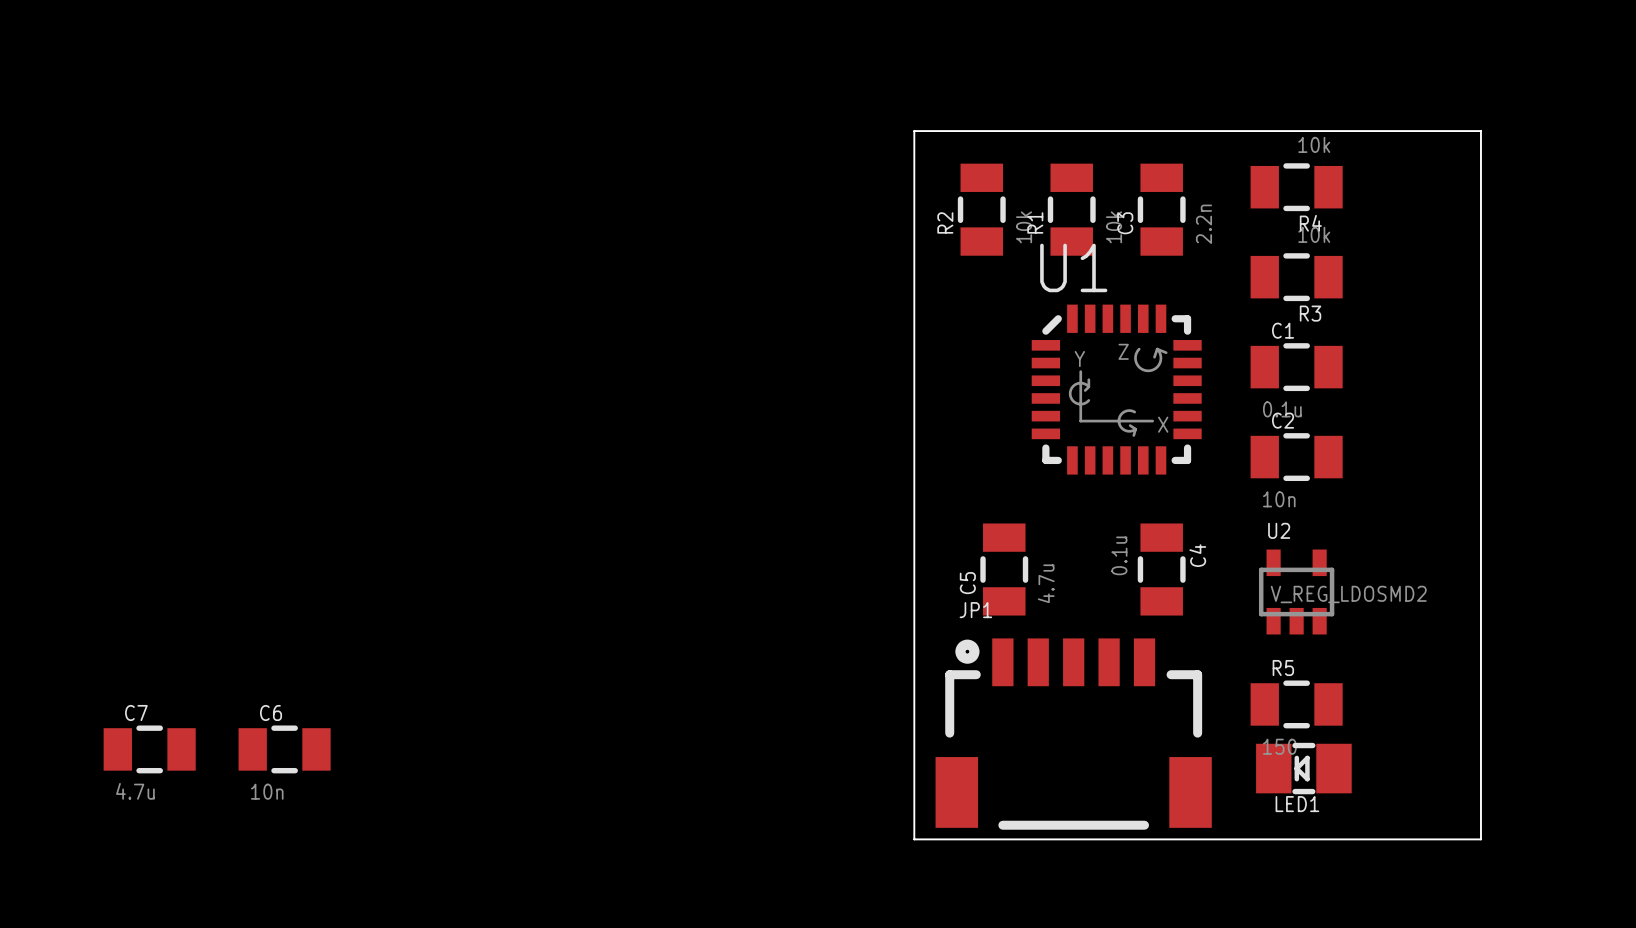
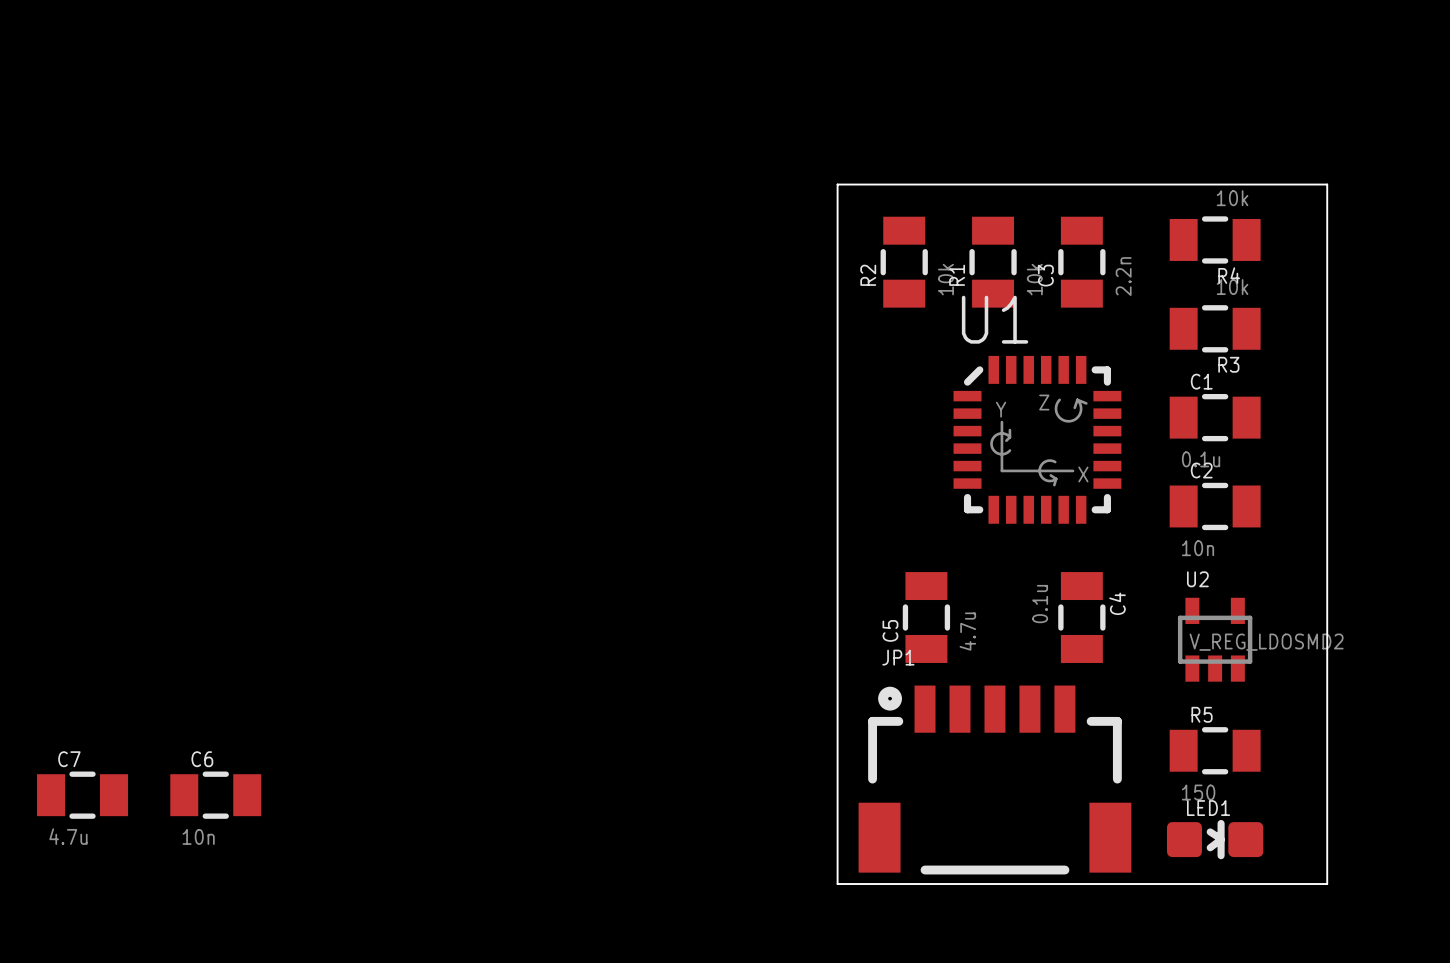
board edge: (1410, 131) (1480, 131) (1480, 839) (1410, 839) -> (1327, 184) (1327, 884)
LED1 footprint: [1256, 742, 1352, 795] -> [1166, 819, 1264, 860]

